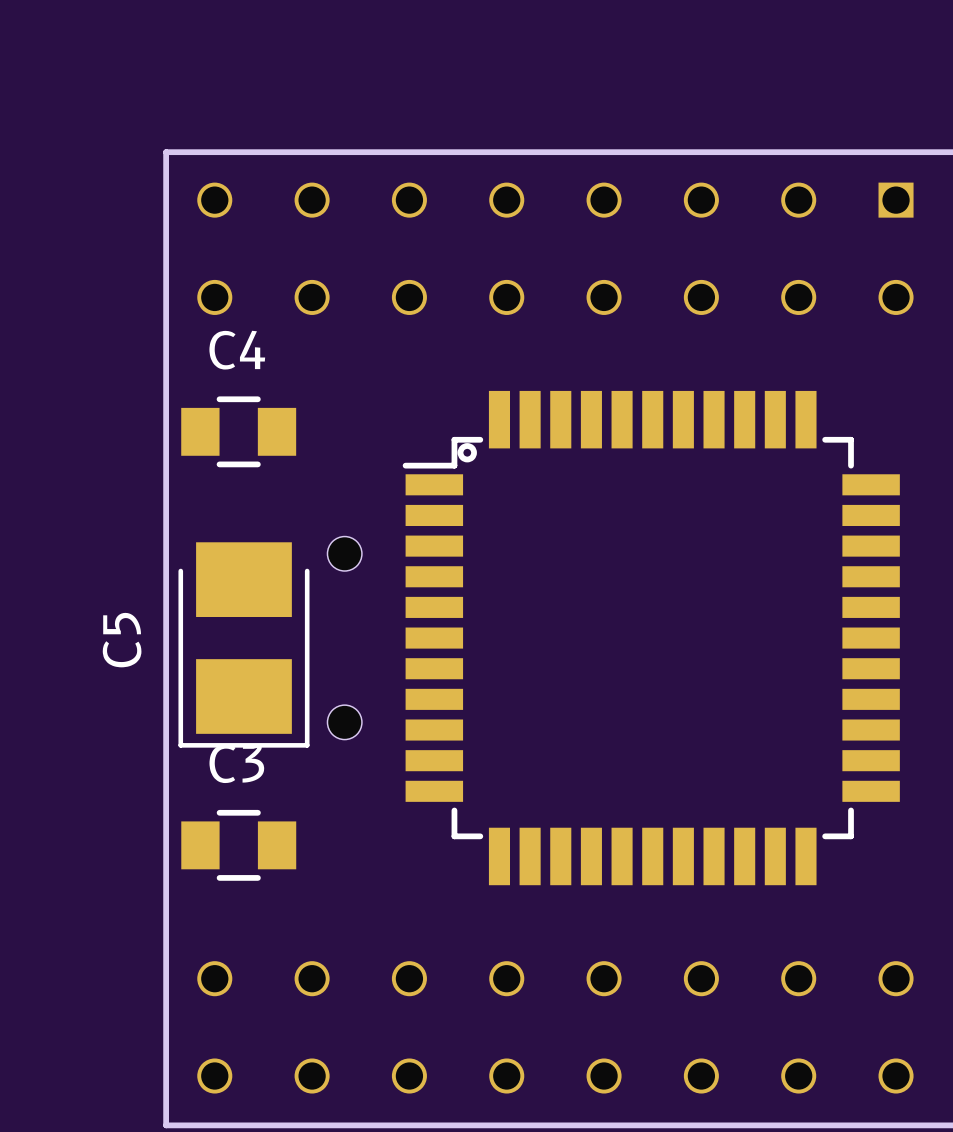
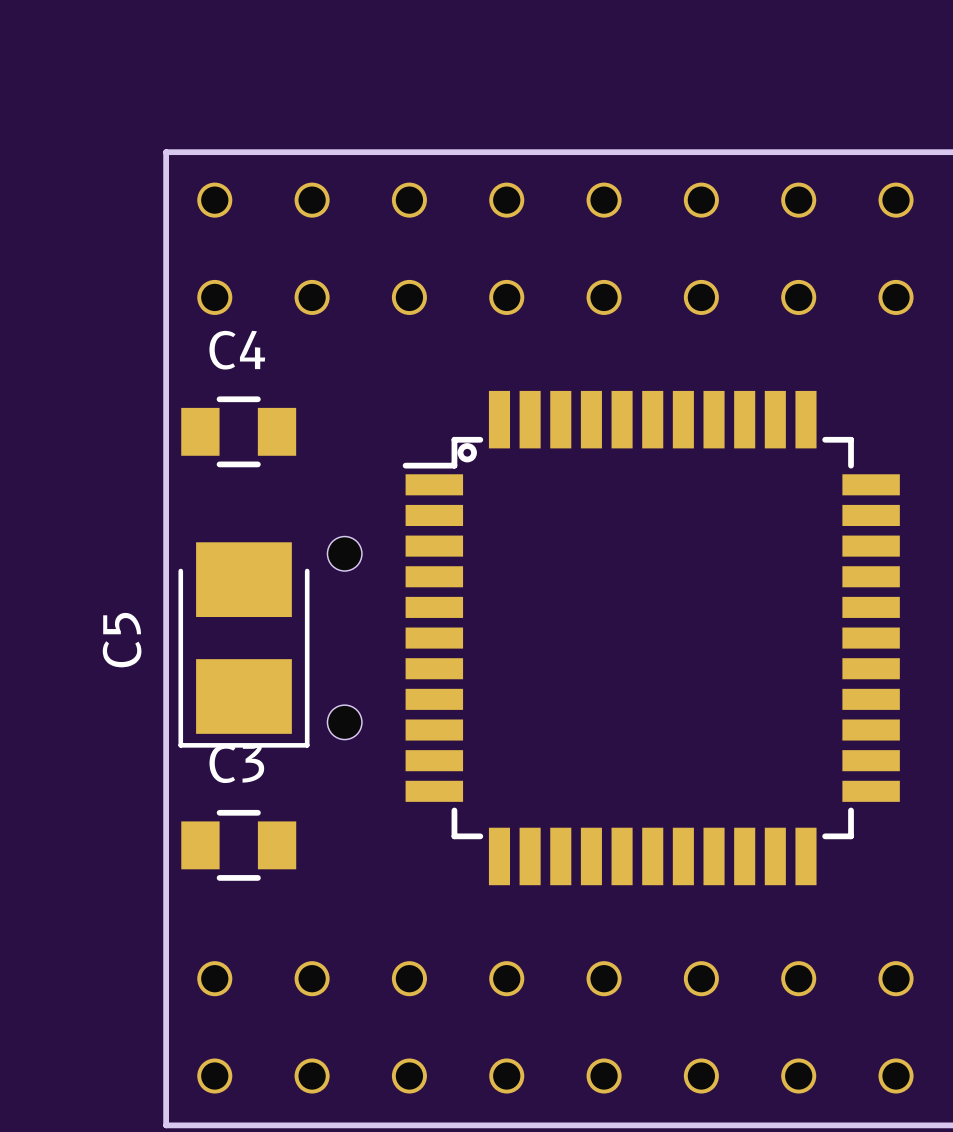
part footprint: [878, 182, 914, 218] -> [878, 182, 914, 218]

